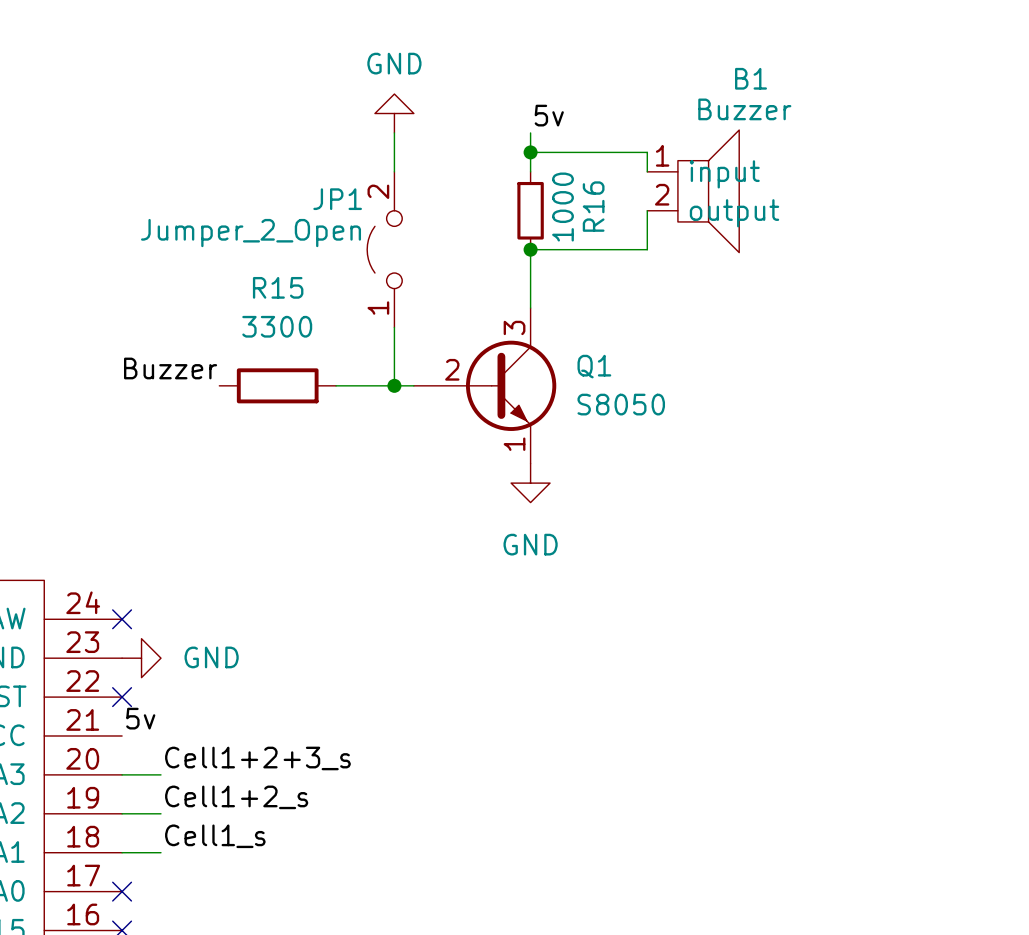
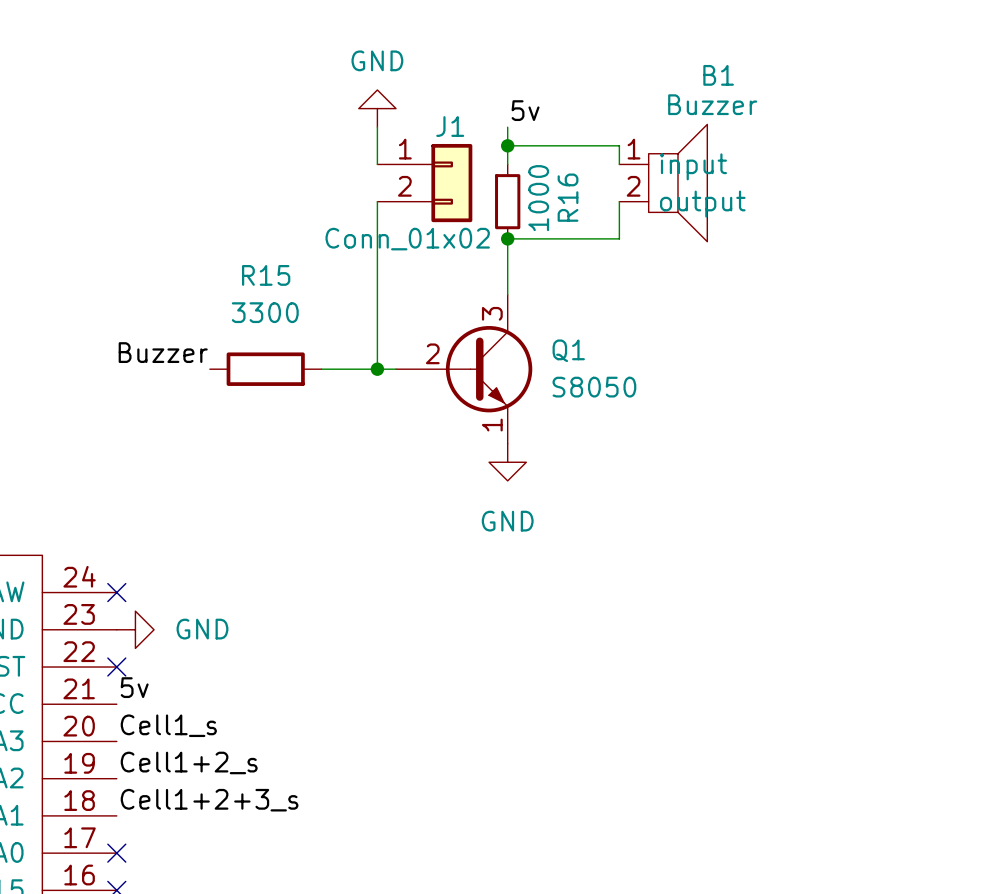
J1: none -> Conn_01x02 (424, 183)
wire: none -> (377, 201) (377, 313)
JP1: Jumper_2_Open (384, 249) -> none
label position: Cell1+2+3_s (257, 758) -> Cell1+2+3_s (209, 800)
wire: (122, 774) (160, 774) -> none
label position: Cell1+2_s (236, 797) -> Cell1+2_s (189, 762)
wire: (122, 813) (160, 813) -> none
label position: Cell1_s (215, 836) -> Cell1_s (168, 725)
wire: (122, 852) (160, 852) -> none

